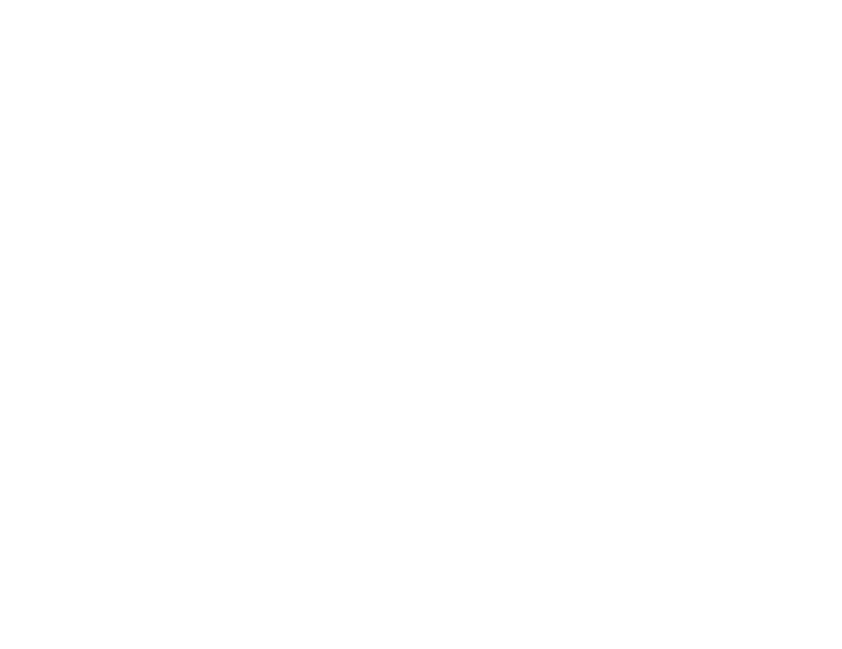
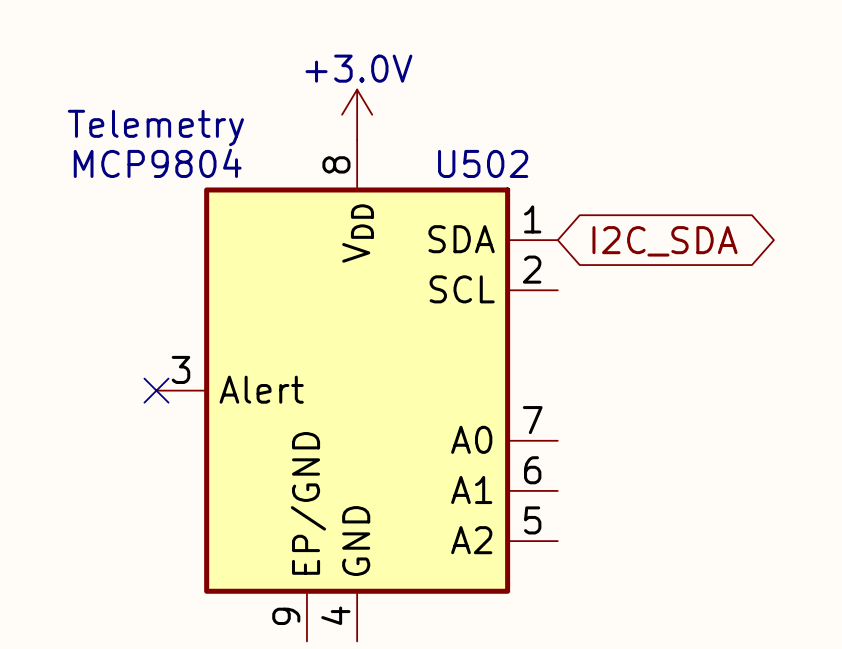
power symbol: none -> +3.0V (357, 114)
global label: none -> I2C_SDA (665, 241)
no-connect mark: none -> (156, 390)
U502: none -> MCP9804 (357, 390)

